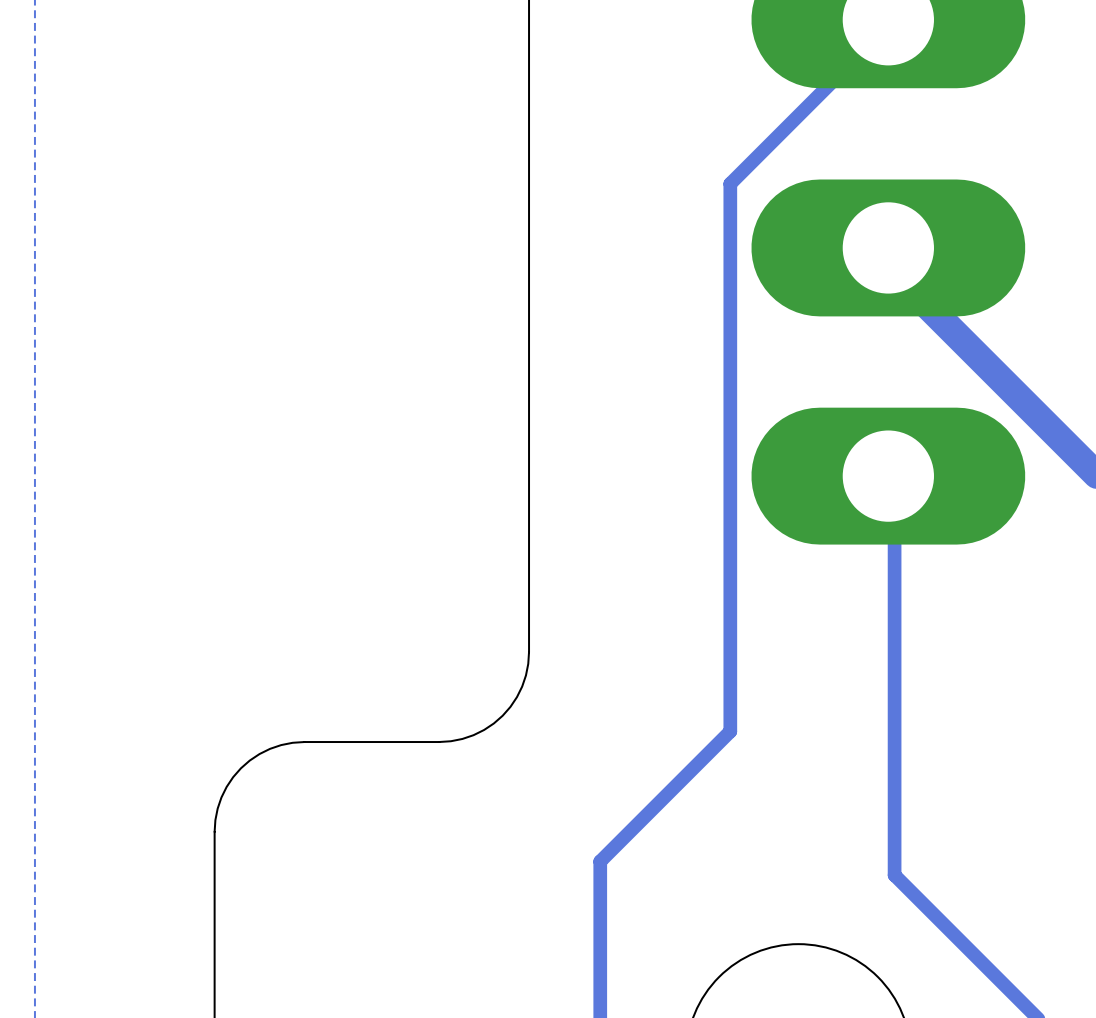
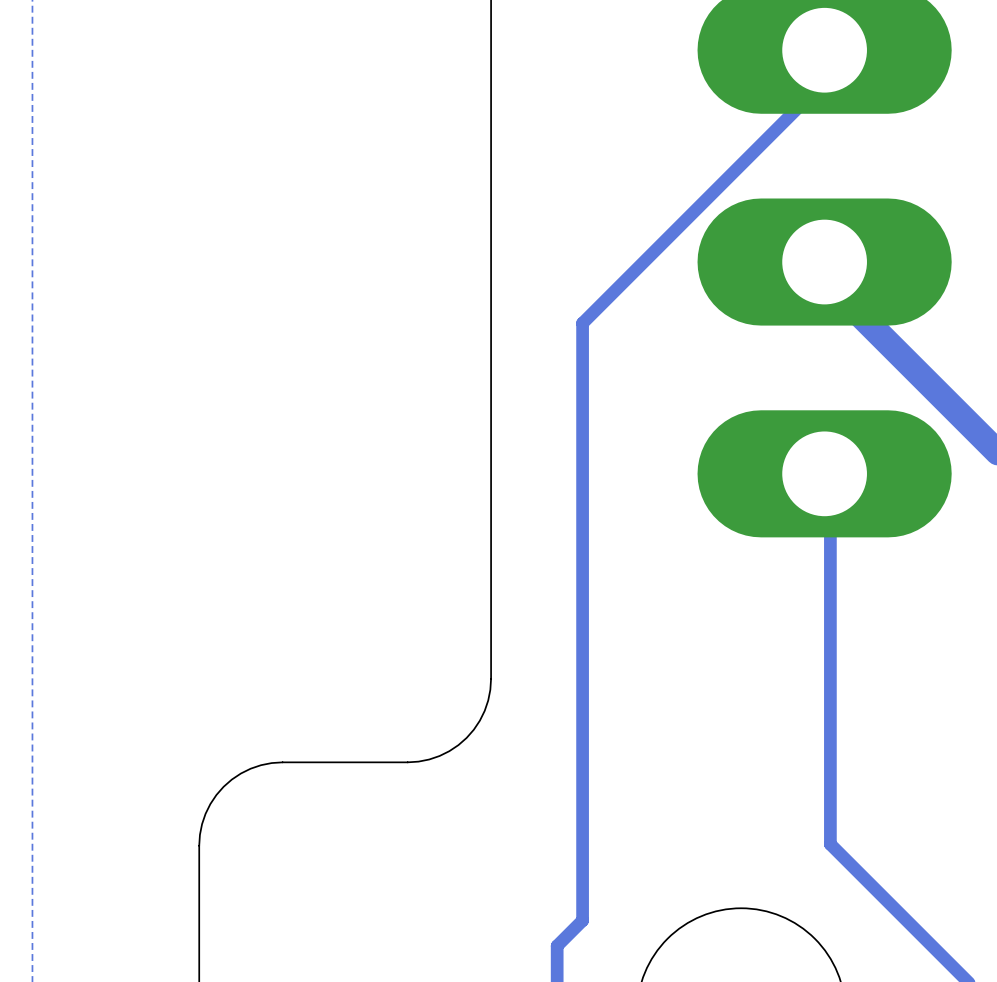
track: (887, 26) (730, 183) (730, 731) (600, 861) (600, 984) -> (824, 56) (824, 81) (582, 323) (582, 920) (557, 945)
board edge: (529, 652) (525, 675) (522, 686) (510, 706) (493, 723) (473, 735) (462, 738) (439, 742) (292, 742) (270, 748) (249, 760) (233, 777) (221, 797) (217, 808) (214, 831) (214, 876) -> (491, 637) (491, 678) (488, 700) (473, 729) (458, 745) (439, 756) (418, 761) (282, 762) (250, 768) (231, 779) (216, 794) (205, 813) (199, 845)

